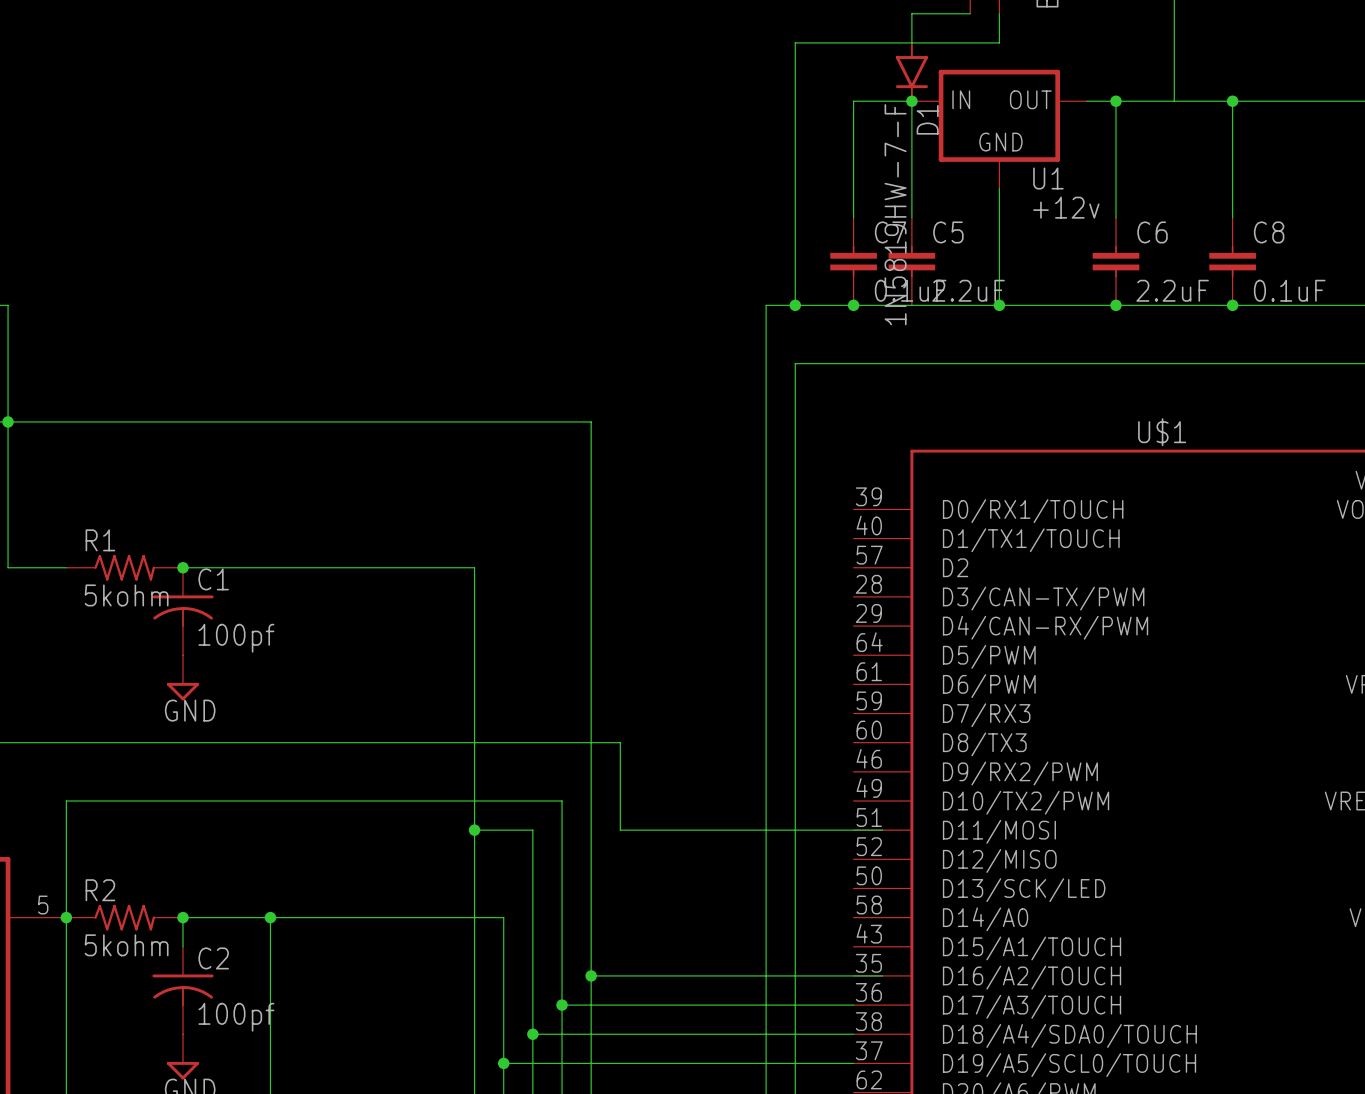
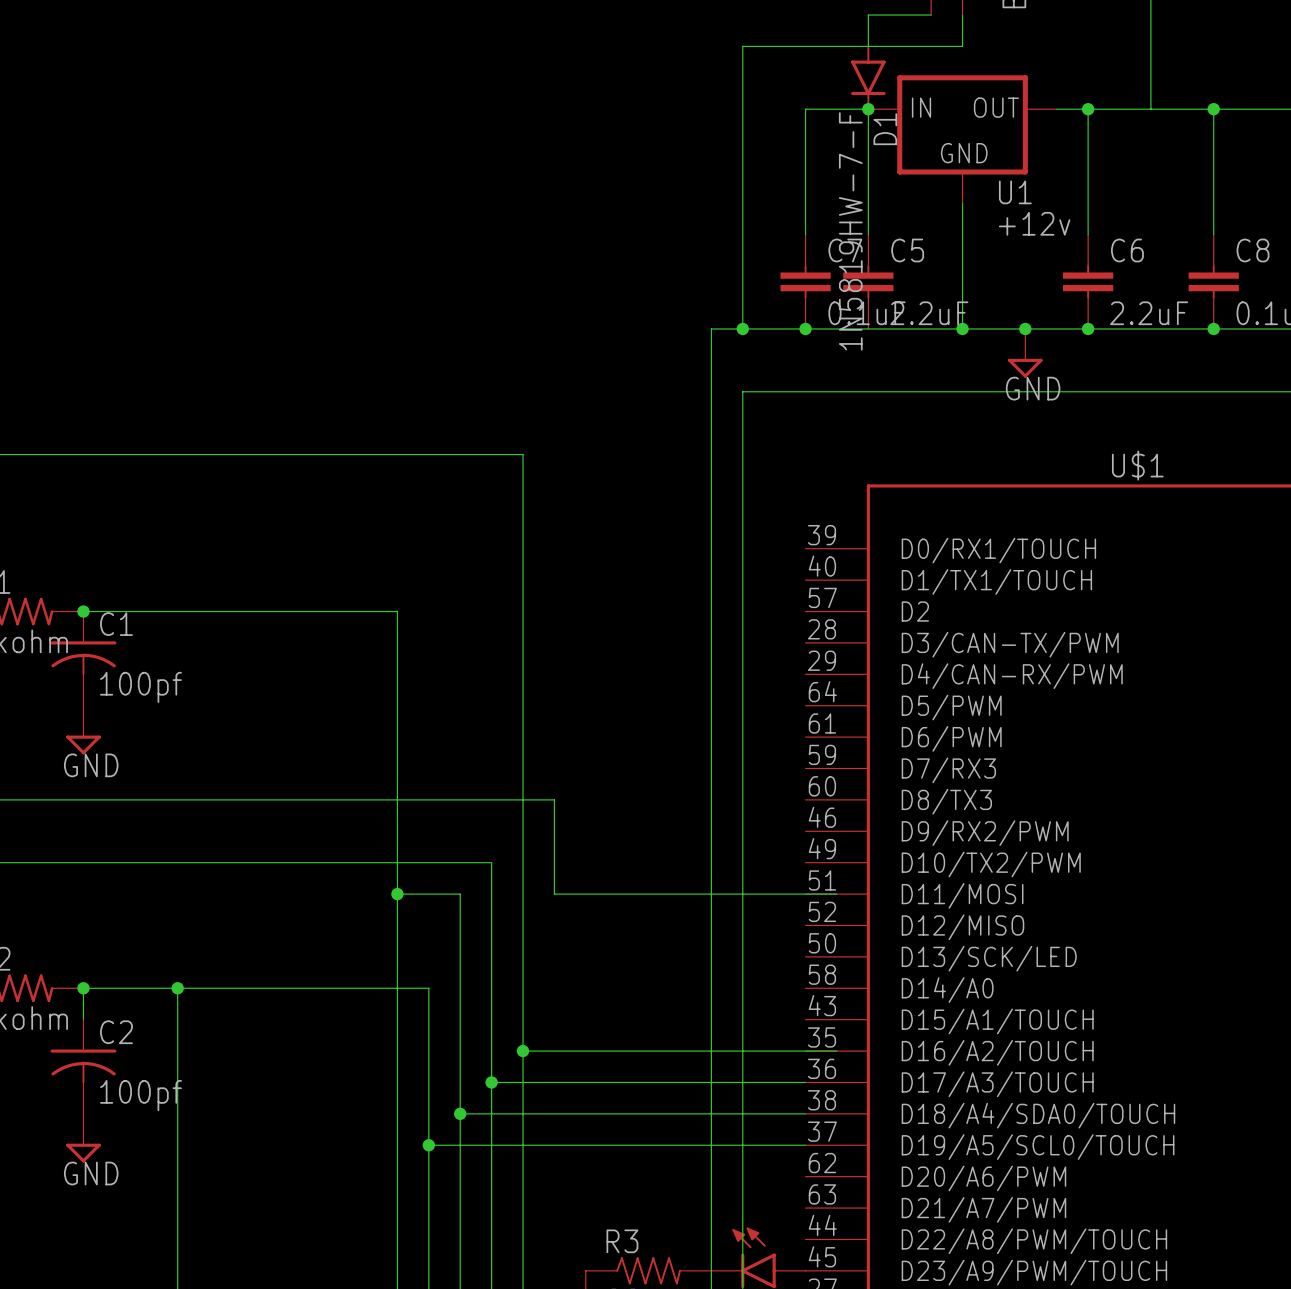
junction: none -> (1025, 328)
power symbol: none -> GND (1025, 353)

